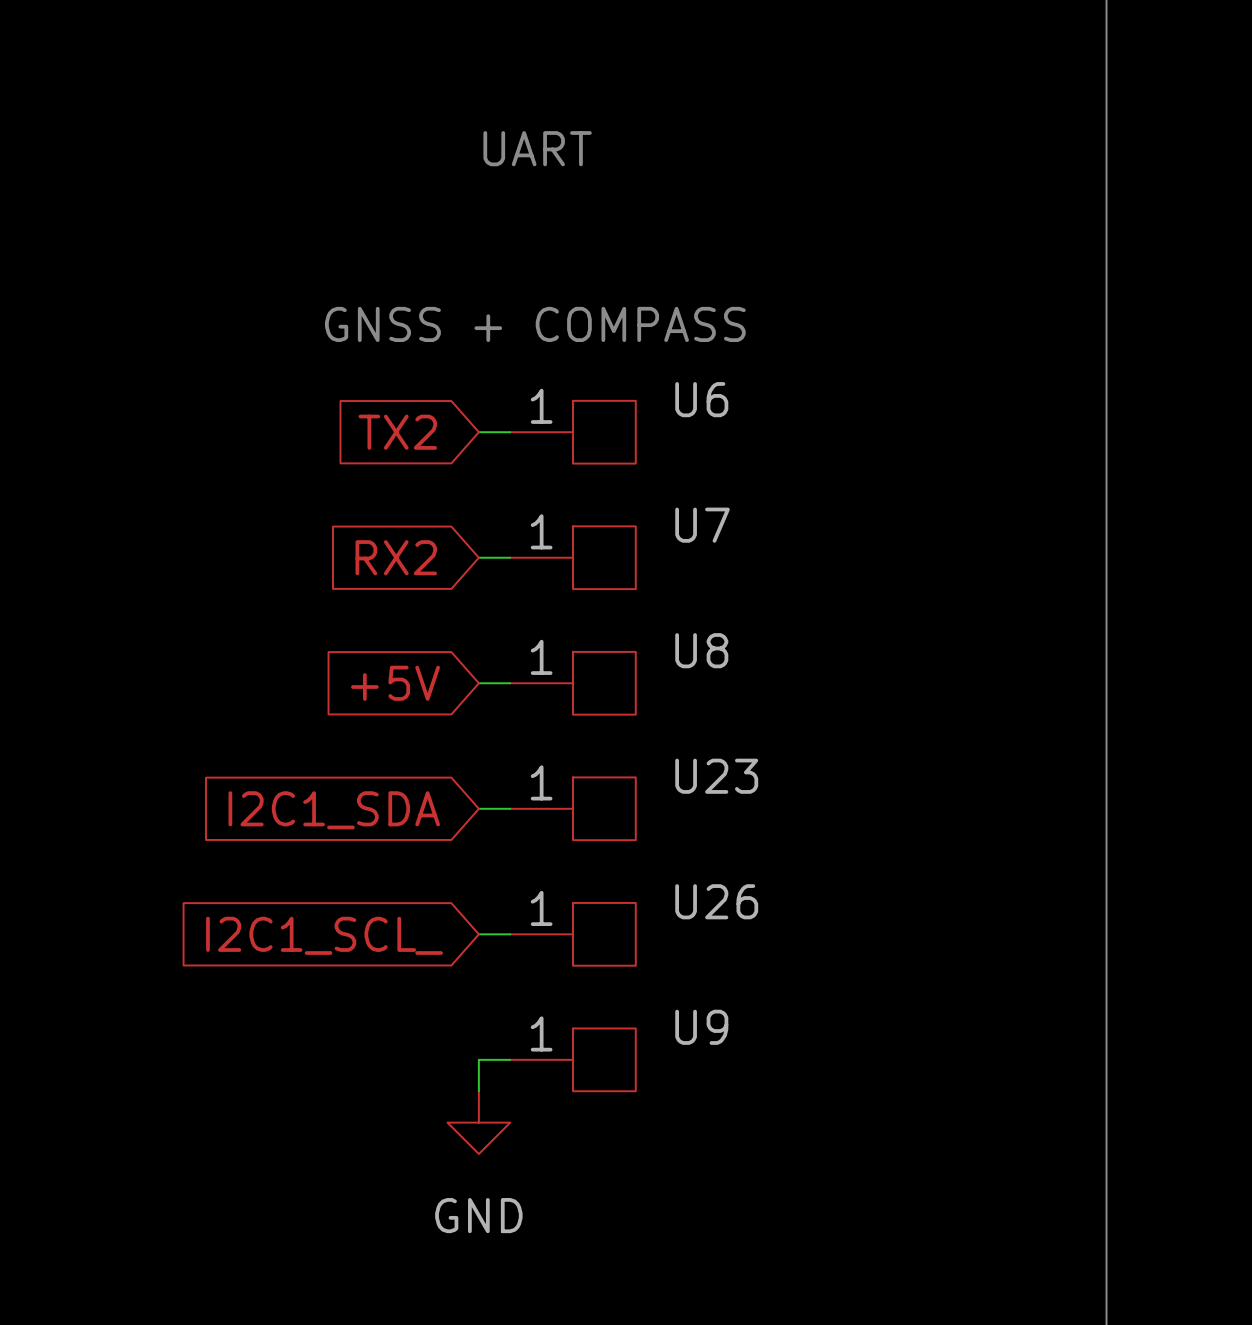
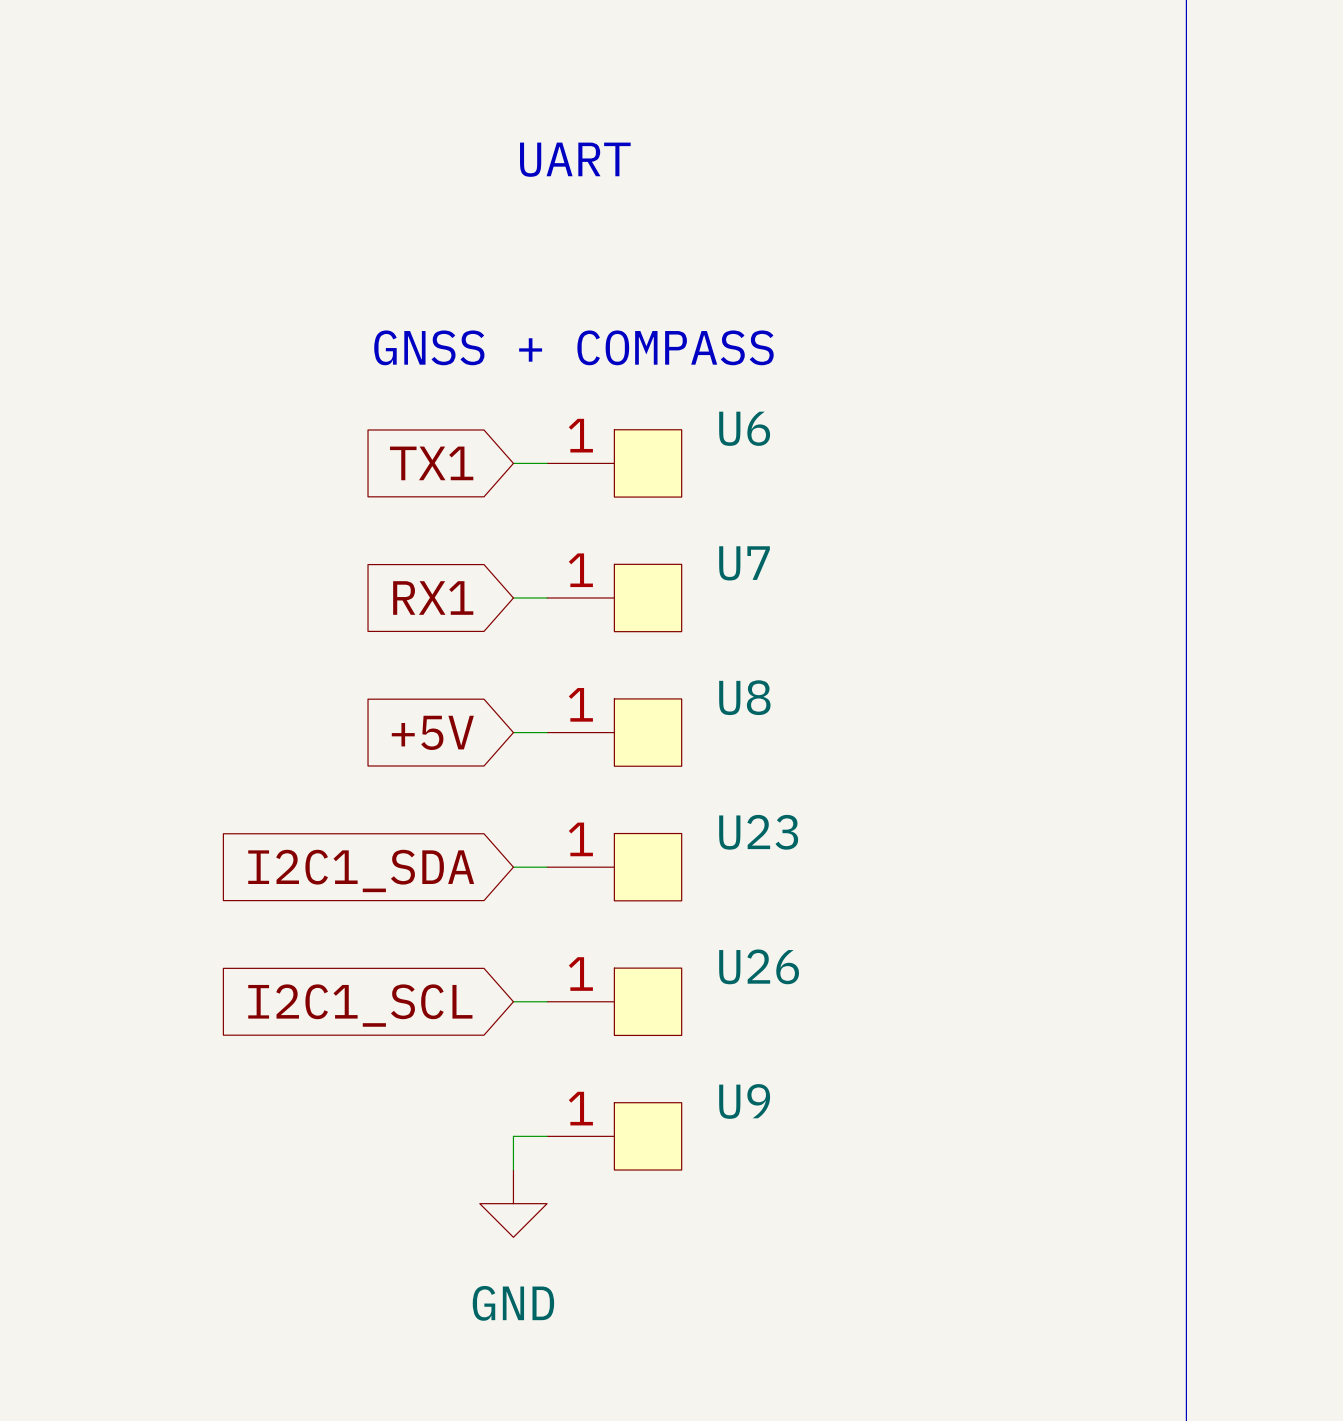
global label: TX2 (397, 432) -> TX1 (431, 463)
global label: RX2 (396, 557) -> RX1 (433, 598)
global label: I2C1_SCL_ (324, 935) -> I2C1_SCL (360, 1005)

